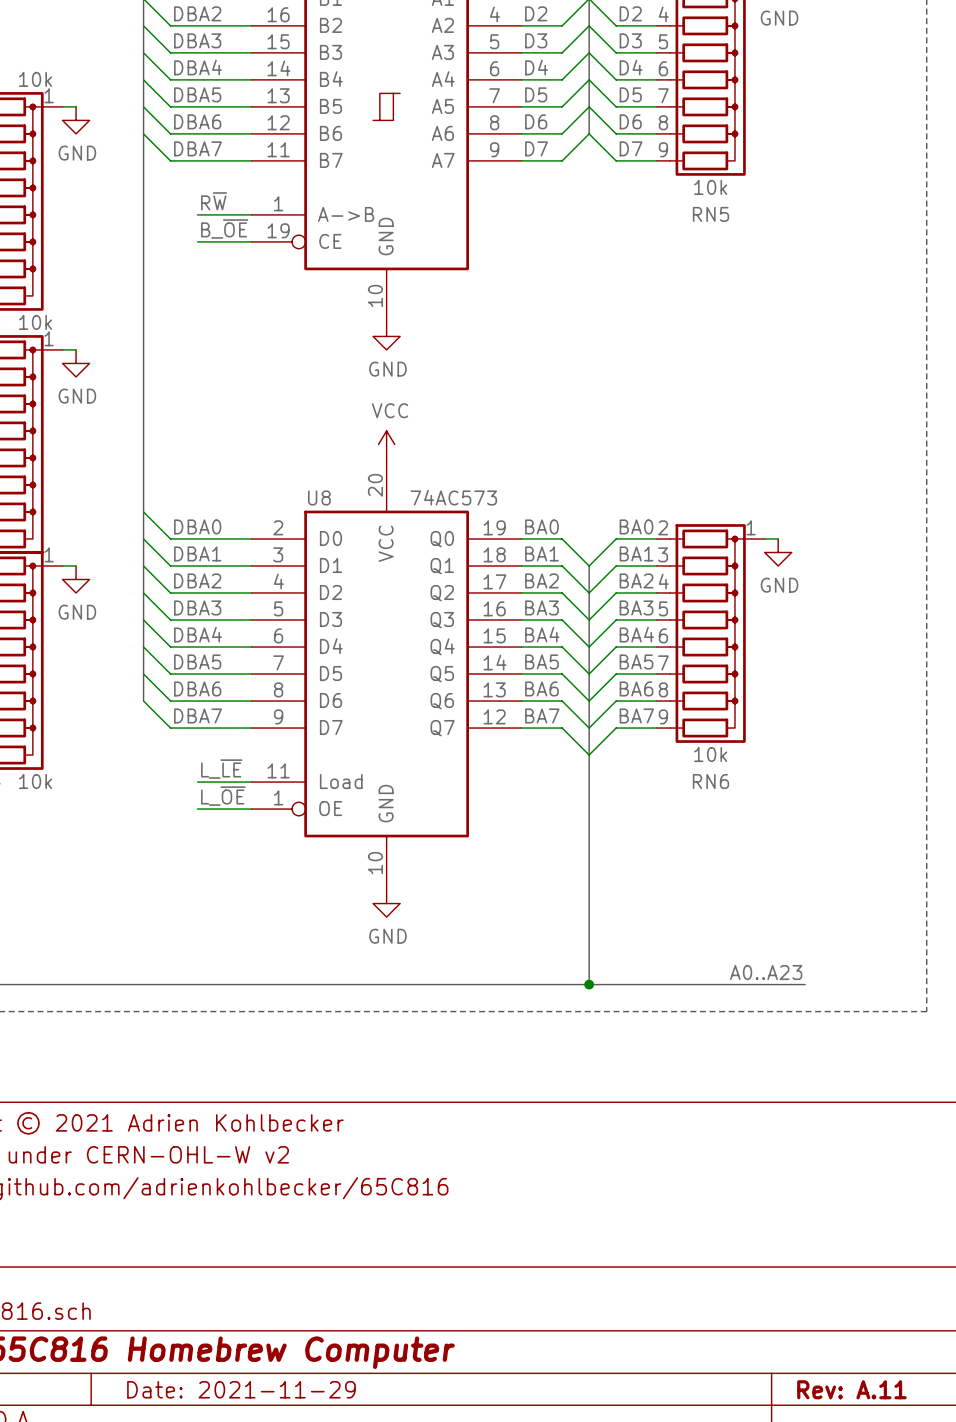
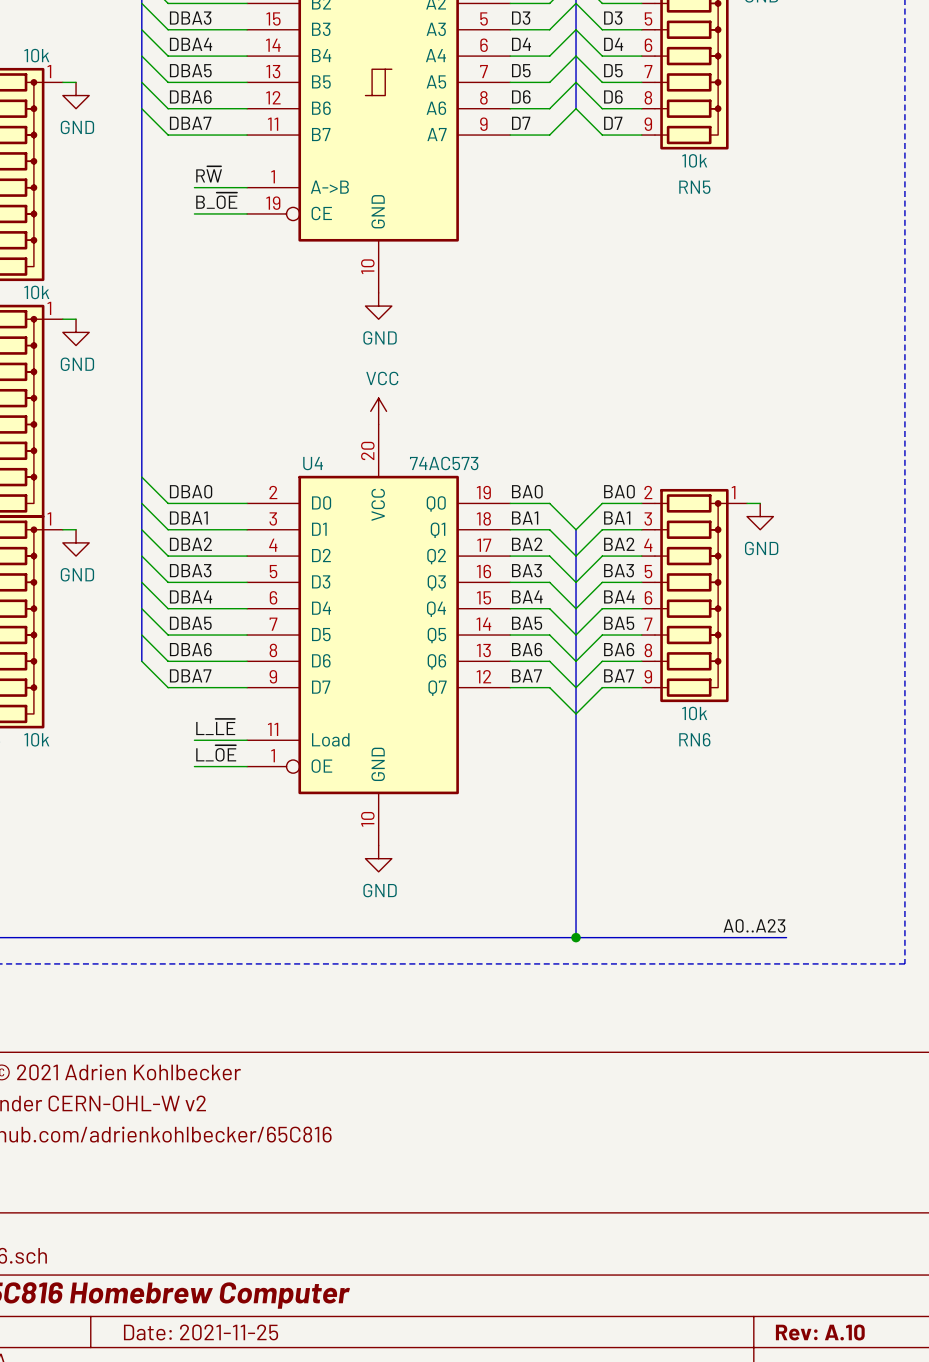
U8 name: U8 (319, 497) -> U4 (313, 463)
title block: Date: 2021-11-29 (241, 1389) -> Date: 2021-11-25 (201, 1332)
title block: Rev: A.11 (851, 1389) -> Rev: A.10 (820, 1332)

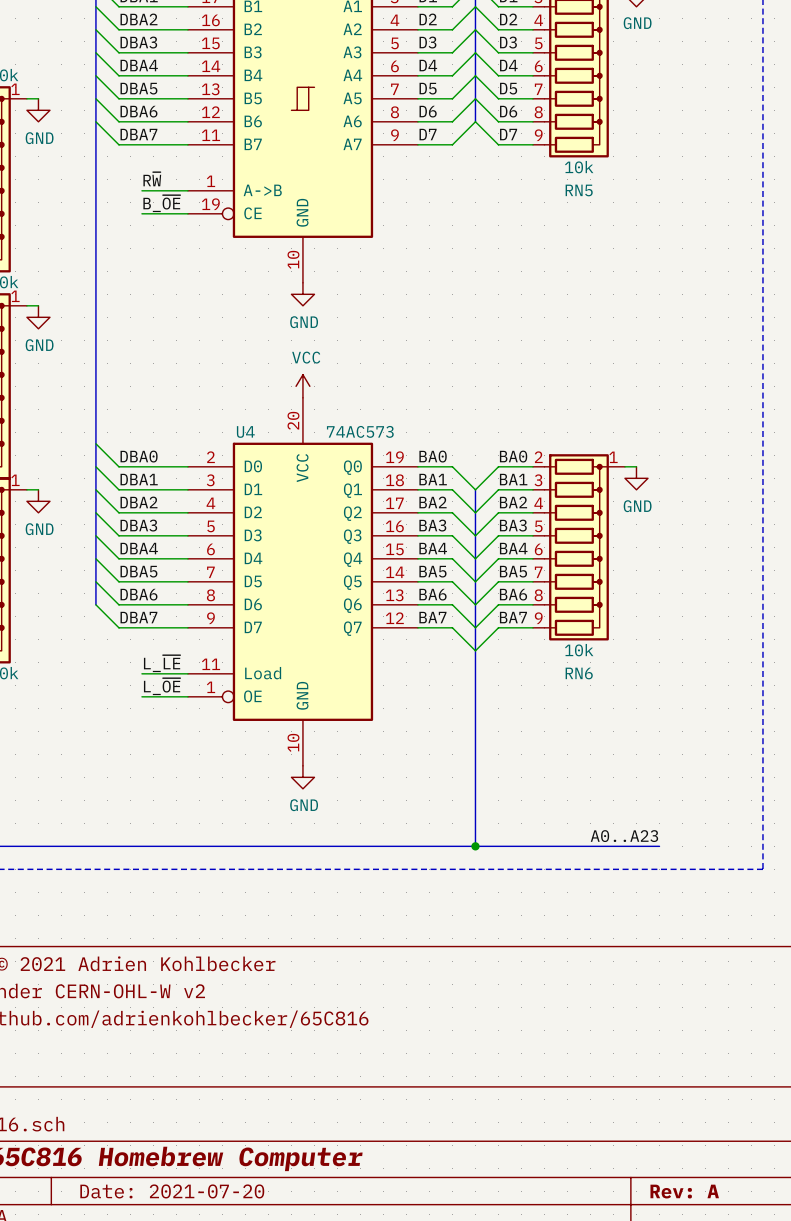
title block: Date: 2021-11-25 (201, 1332) -> Date: 2021-07-20 (172, 1191)
title block: Rev: A.10 (820, 1332) -> Rev: A (684, 1191)

